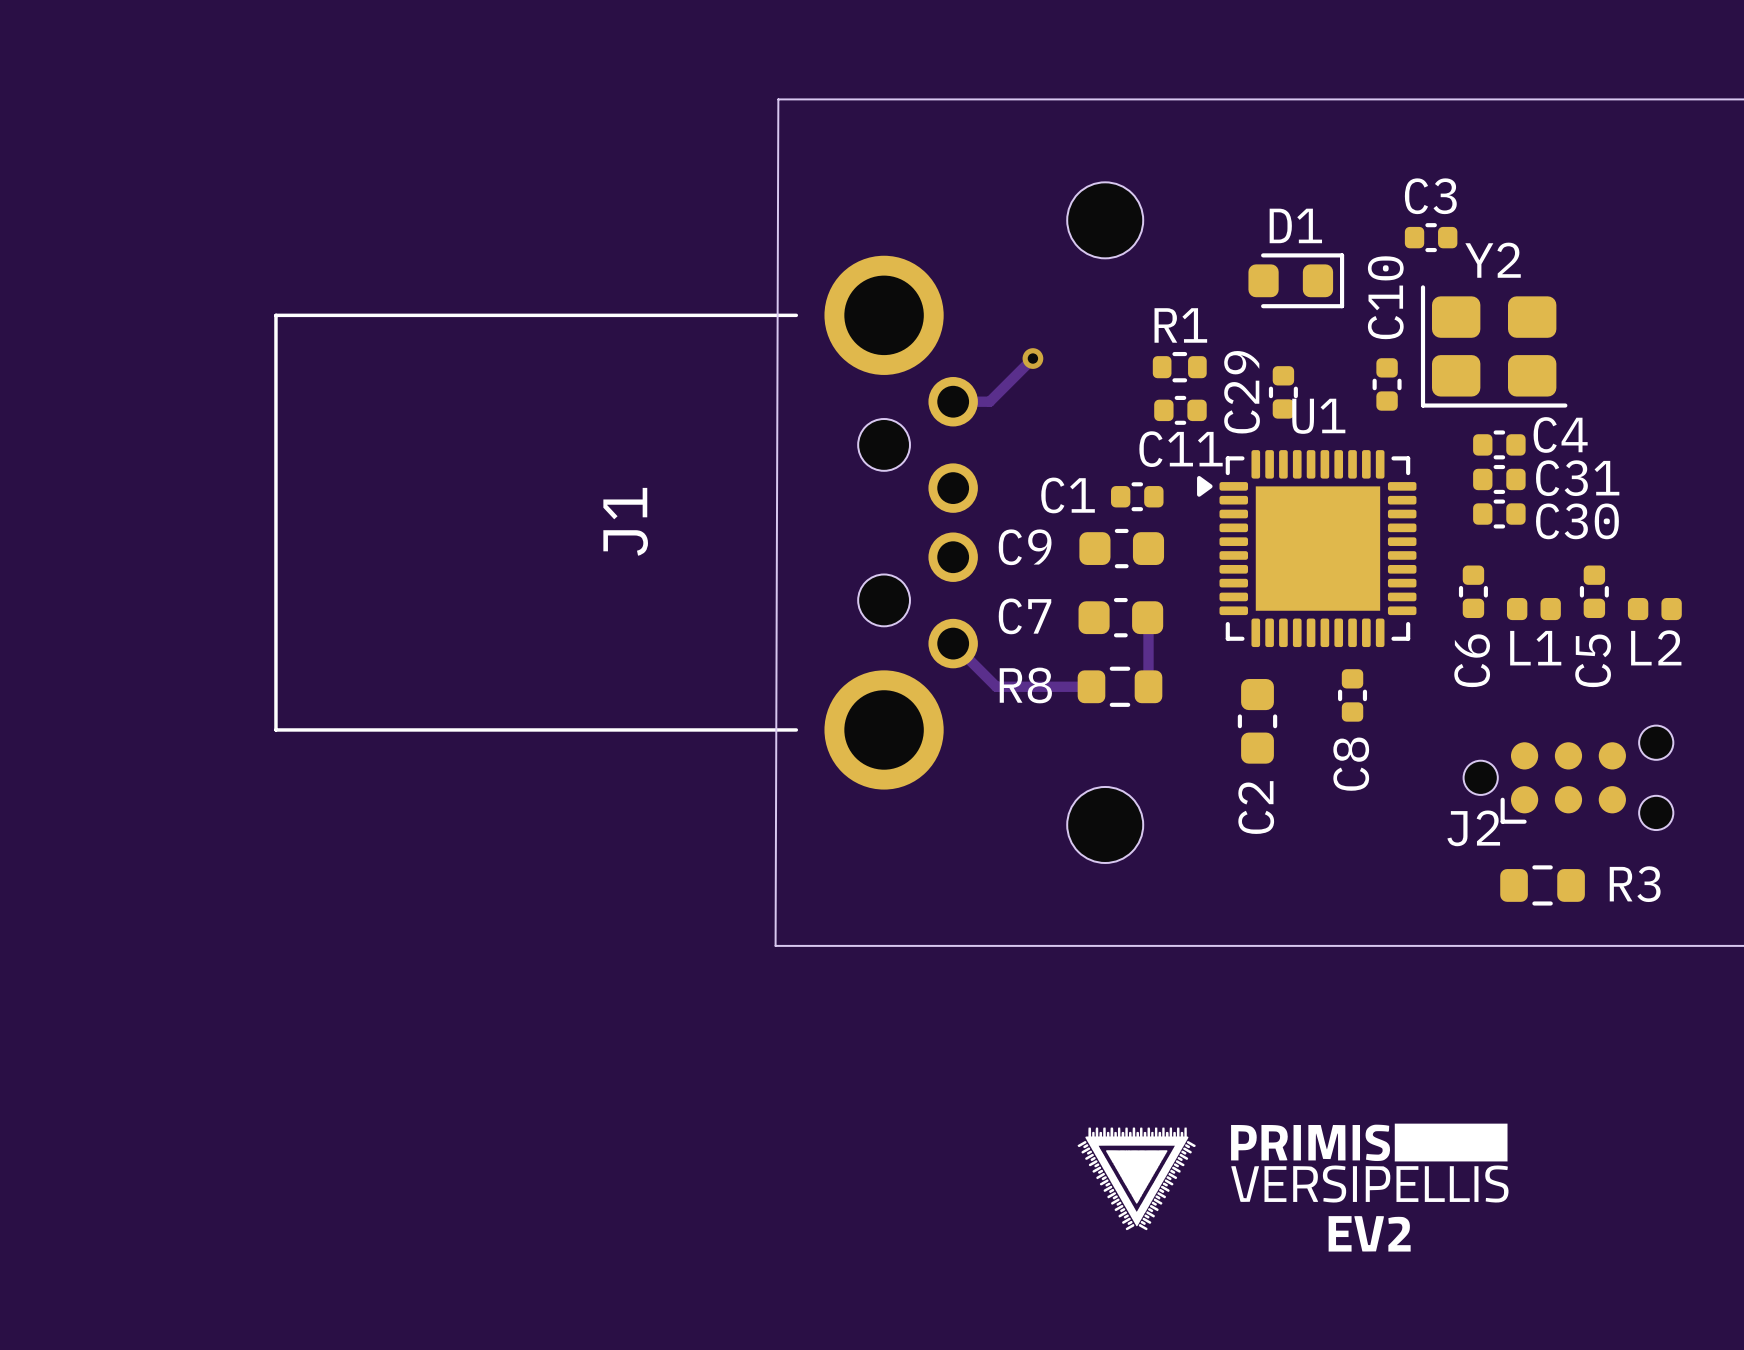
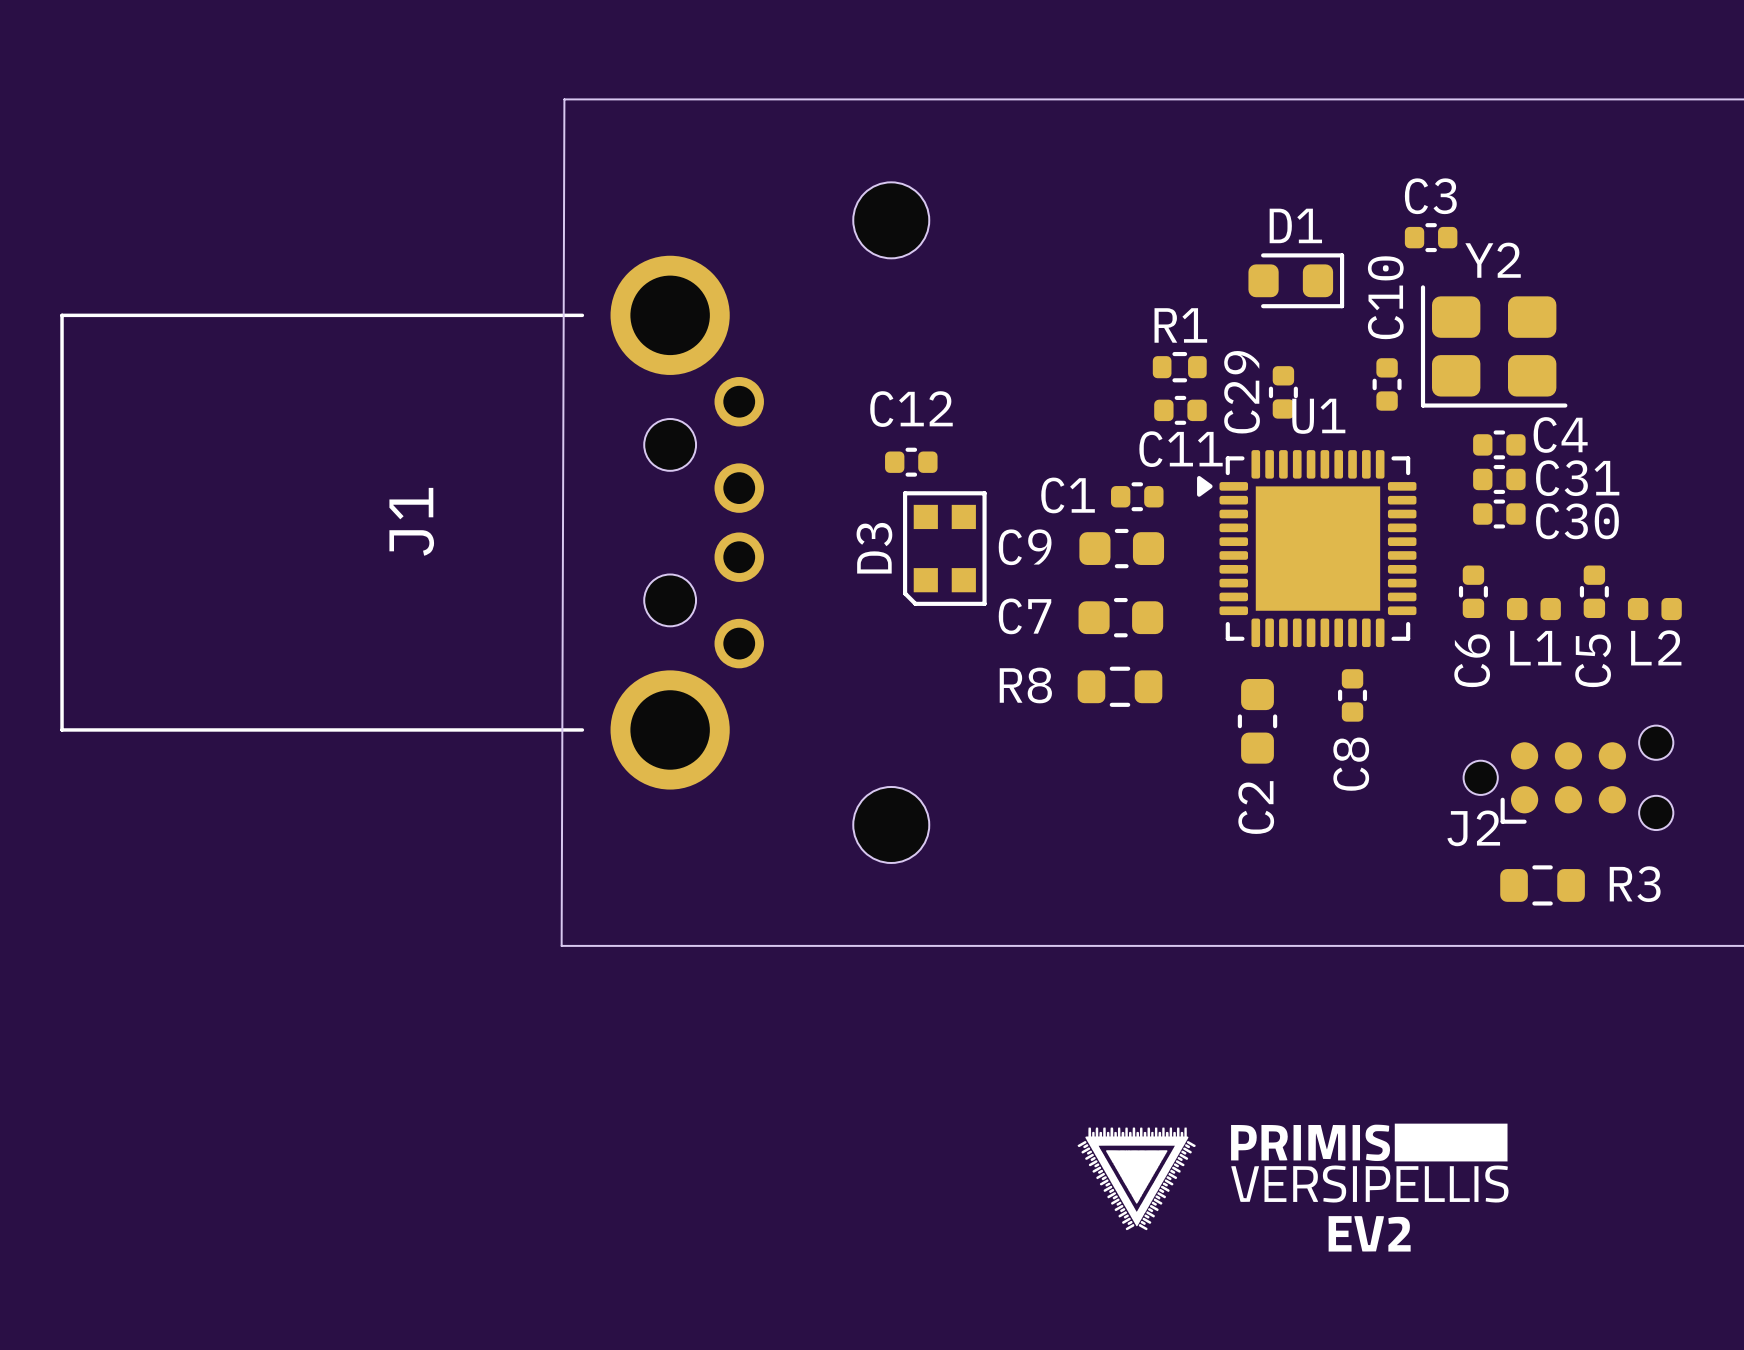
board edge: (778, 99) (775, 945) -> (778, 99) (564, 99) (561, 945) (775, 945)
part position: (1105, 220) -> (891, 220)
track: (1032, 358) (989, 401) (953, 401) -> none
via: (1032, 358) -> none
C12: none -> (911, 462)
J1 position: (626, 522) -> (412, 522)
D3: none -> (944, 548)
track: (1147, 617) (1148, 686) -> none
track: (953, 643) (996, 686) (1091, 686) -> none
part position: (1105, 824) -> (891, 824)

